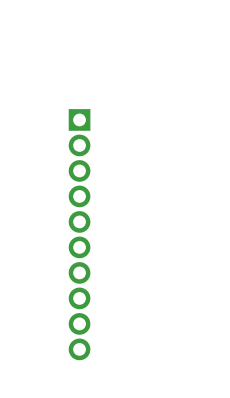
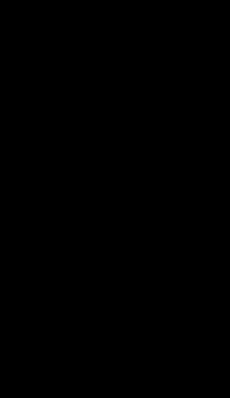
part: (79, 234) -> none

